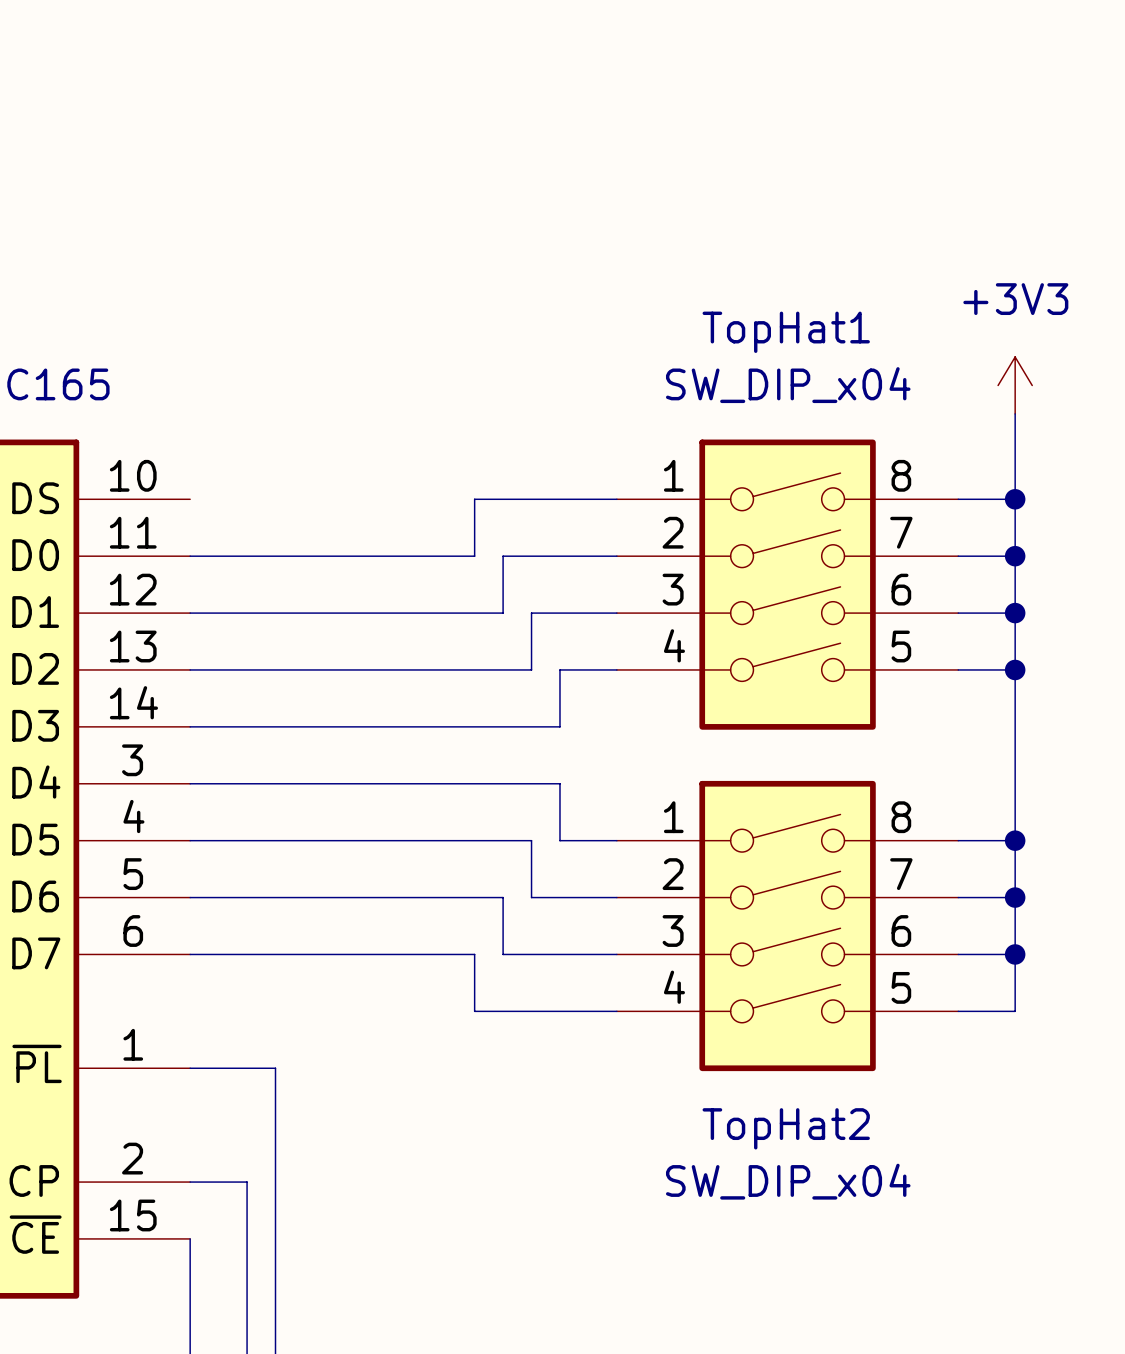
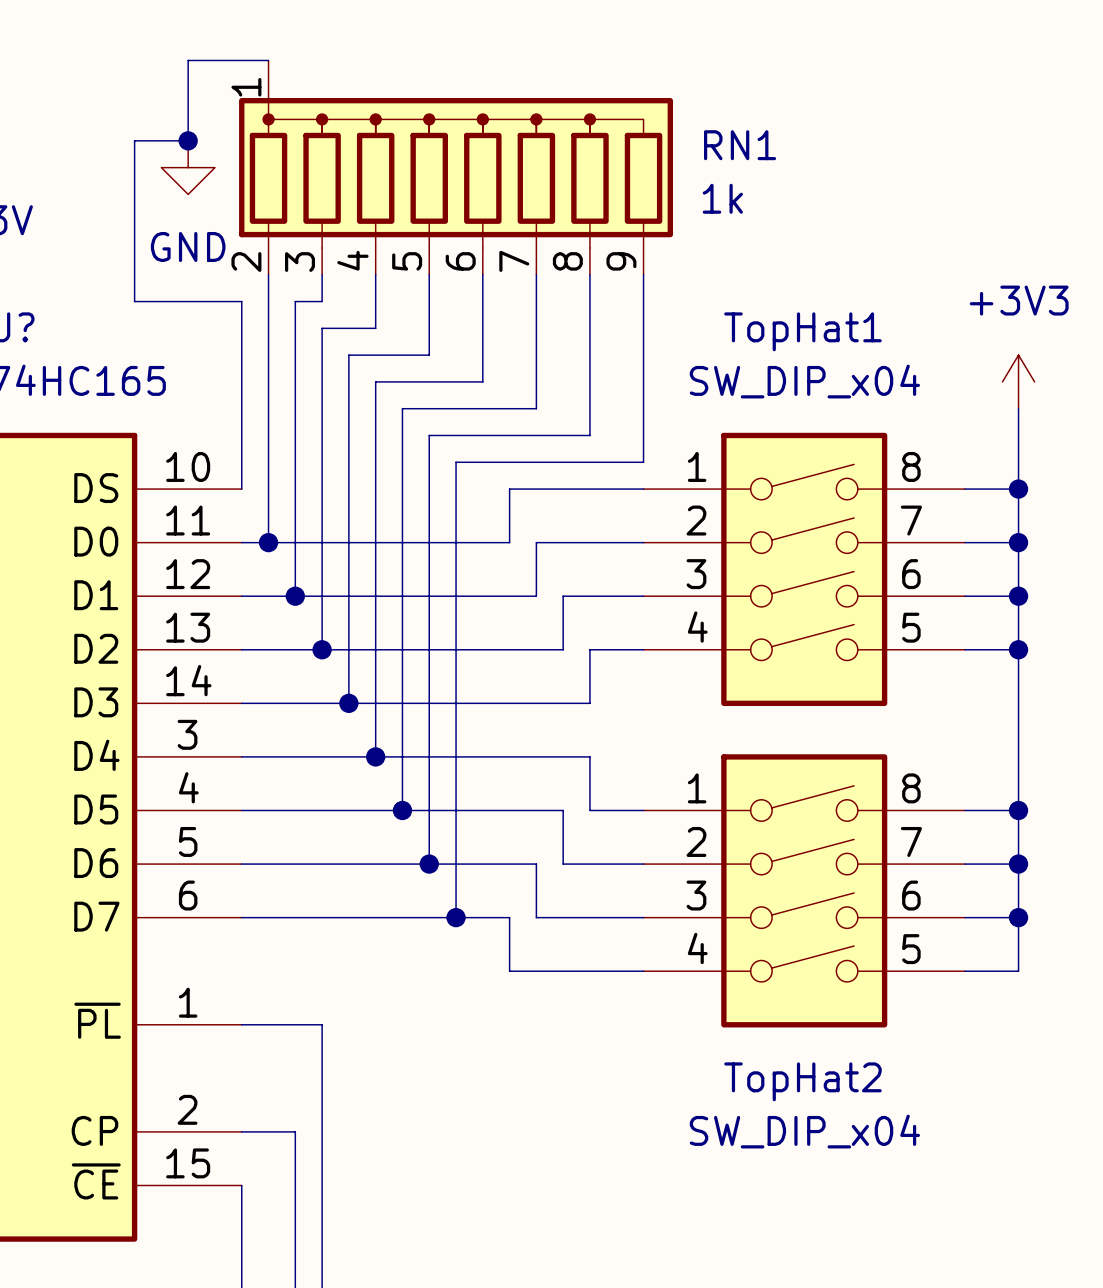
wire: none -> (268, 60) (188, 60) (188, 140) (134, 140) (134, 301) (241, 301) (241, 489)
junction: none -> (188, 140)
power symbol: none -> GND (188, 167)
RN1: none -> 1k (456, 167)
wire: none -> (268, 274) (268, 542)
wire: none -> (322, 274) (322, 301) (295, 301) (295, 596)
wire: none -> (375, 274) (375, 328) (322, 328) (322, 649)
wire: none -> (429, 274) (429, 355) (348, 355) (348, 703)
wire: none -> (482, 274) (482, 381) (375, 381) (375, 756)
wire: none -> (536, 274) (536, 408) (402, 408) (402, 810)
wire: none -> (589, 274) (589, 435) (429, 435) (429, 864)
wire: none -> (643, 274) (643, 462) (456, 462) (456, 917)
junction: none -> (268, 542)
junction: none -> (295, 596)
junction: none -> (322, 649)
junction: none -> (348, 703)
junction: none -> (375, 756)
junction: none -> (402, 810)
junction: none -> (429, 864)
junction: none -> (456, 917)

